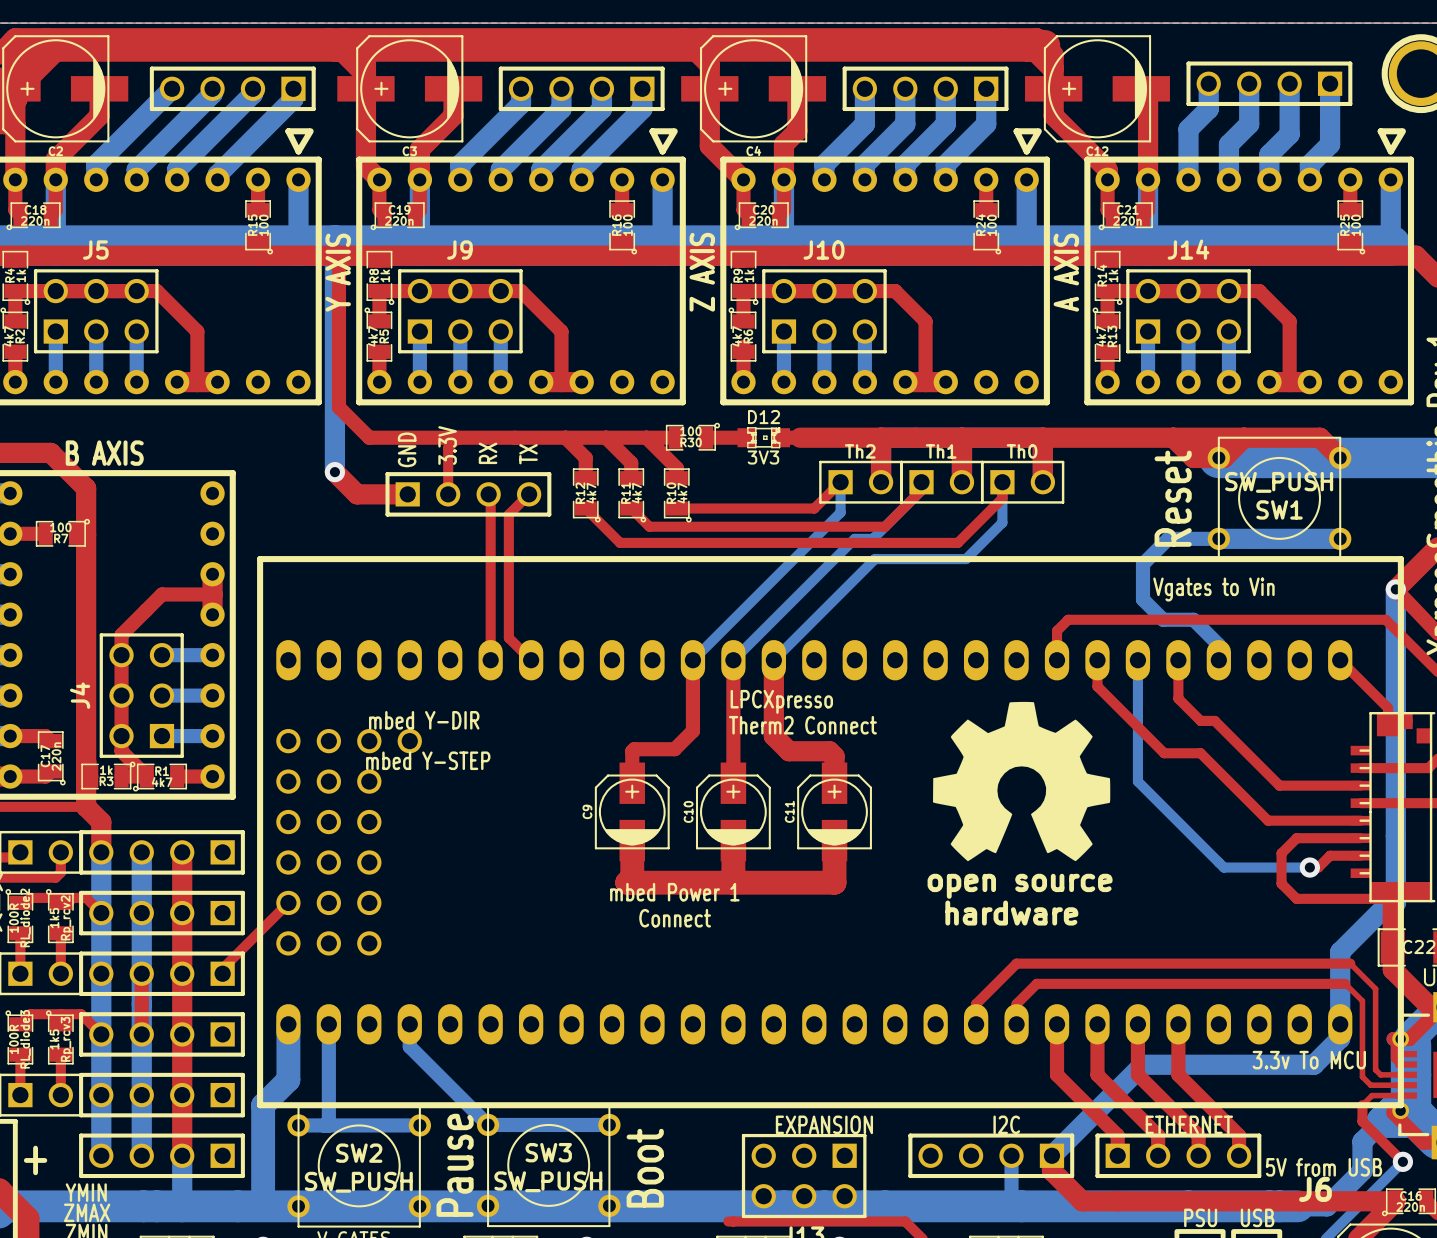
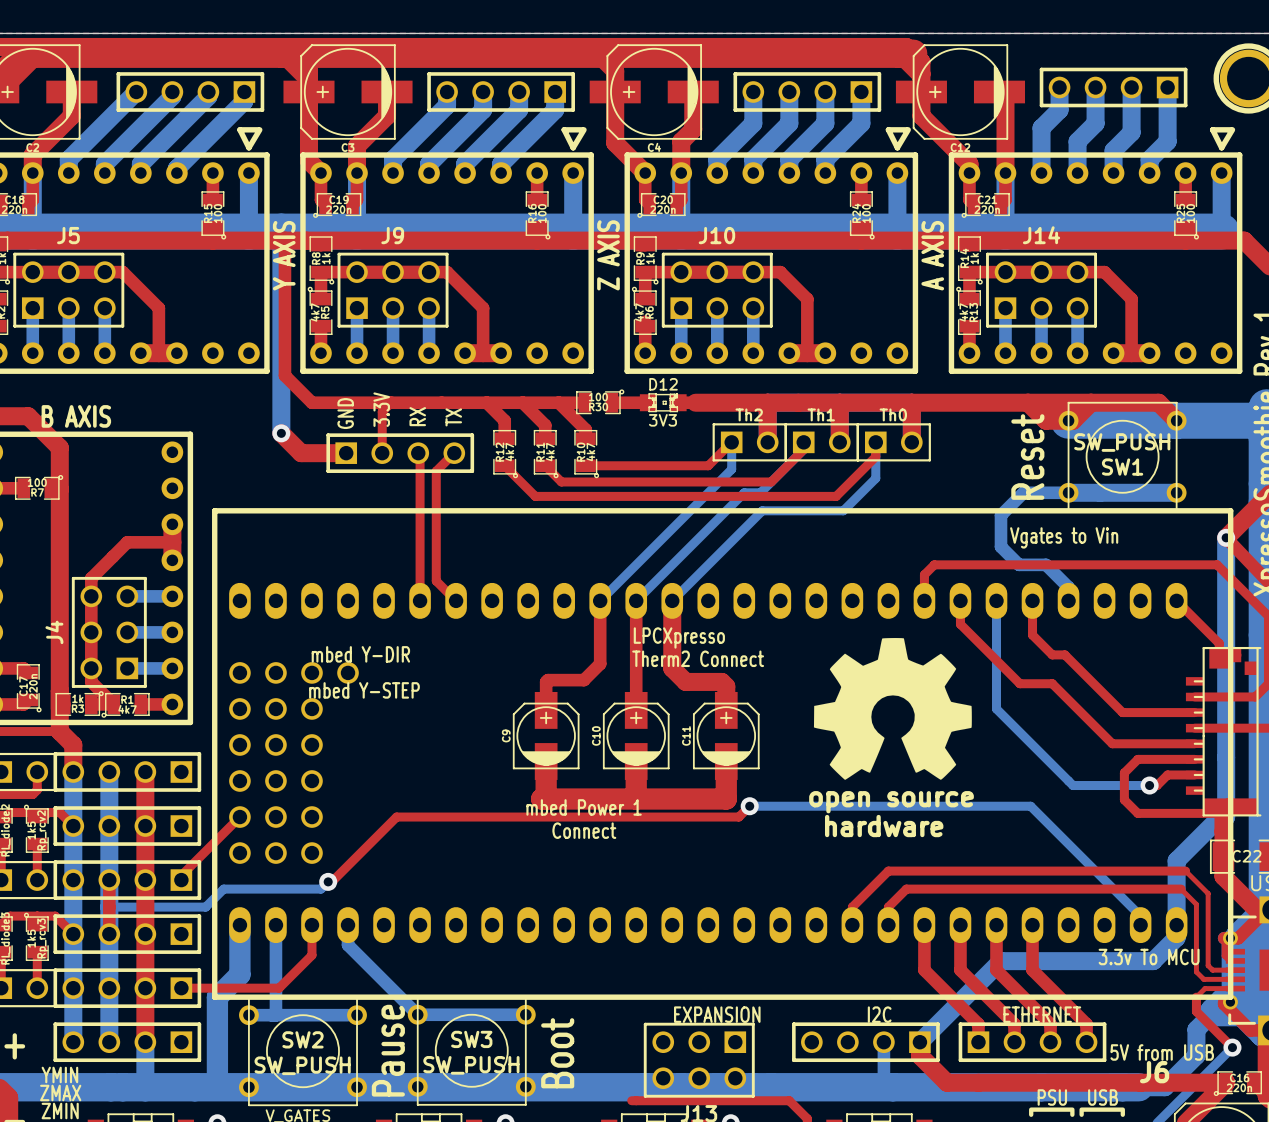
top track: none -> (749, 806) (738, 817) (396, 817) (331, 881) (328, 881)
bottom track: none -> (749, 806) (1030, 806) (1140, 916) (1140, 925)
via: none -> (749, 806)
bottom track: none -> (328, 881) (320, 889) (223, 889) (205, 907) (109, 907)
via: none -> (328, 881)
top track: none -> (311, 925) (311, 955) (279, 988) (181, 988)

